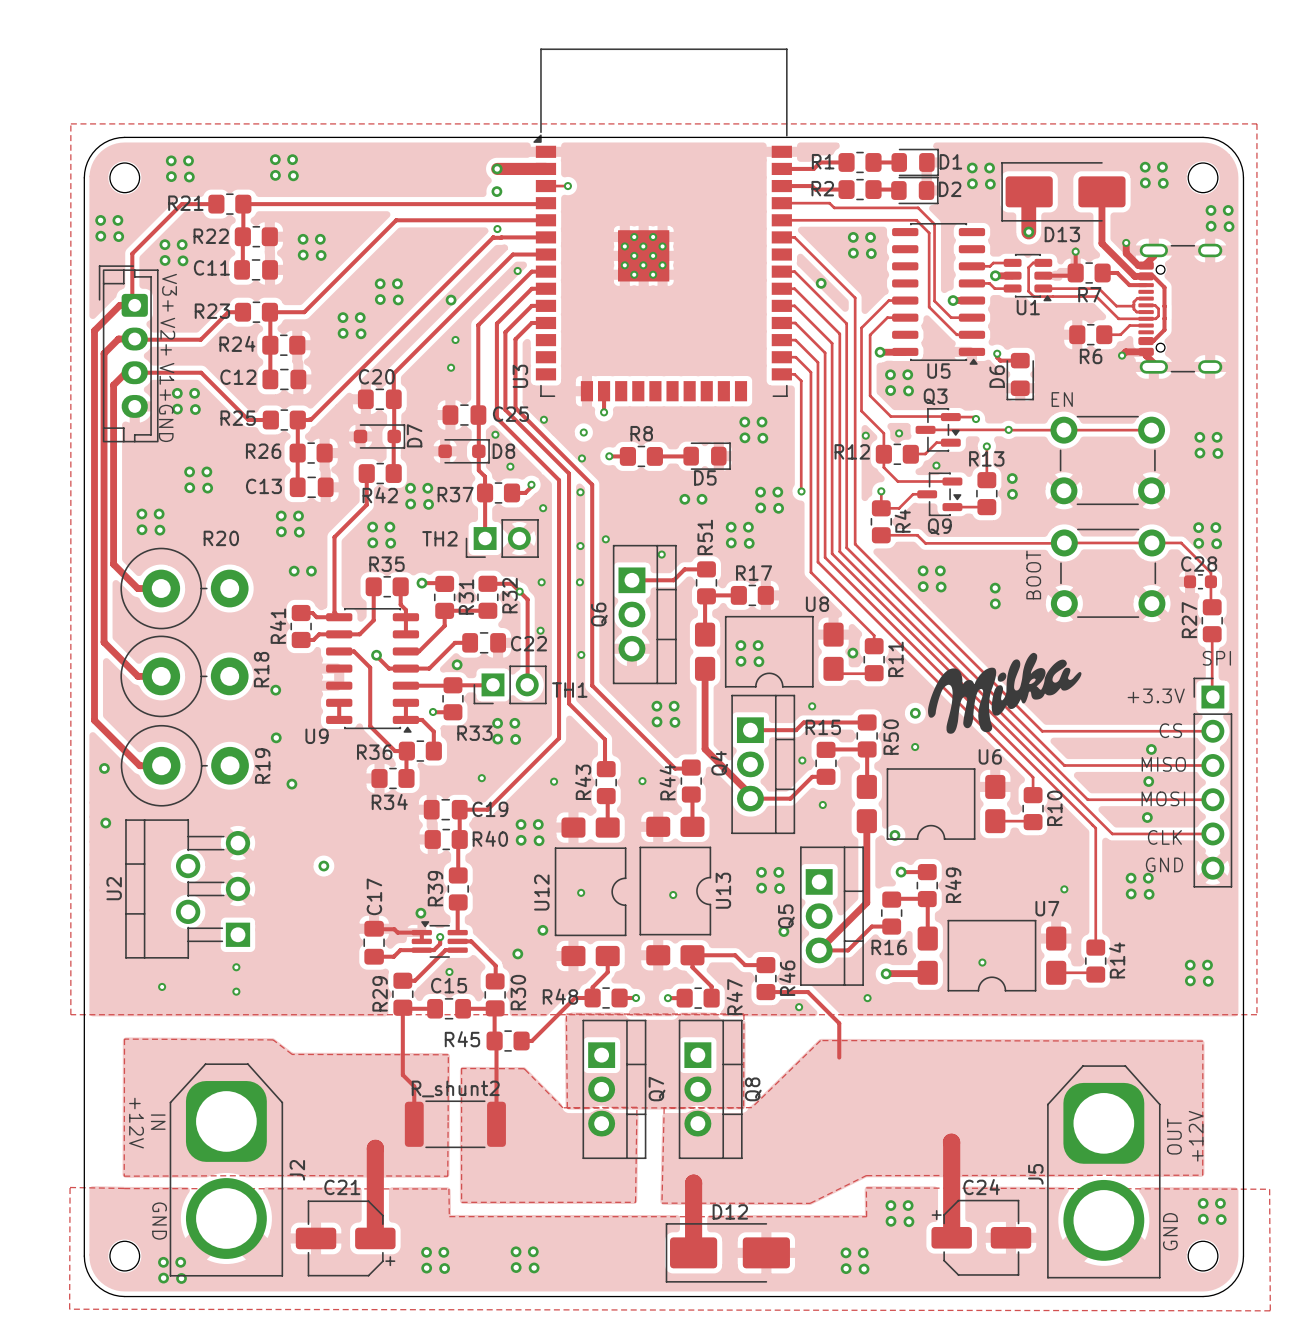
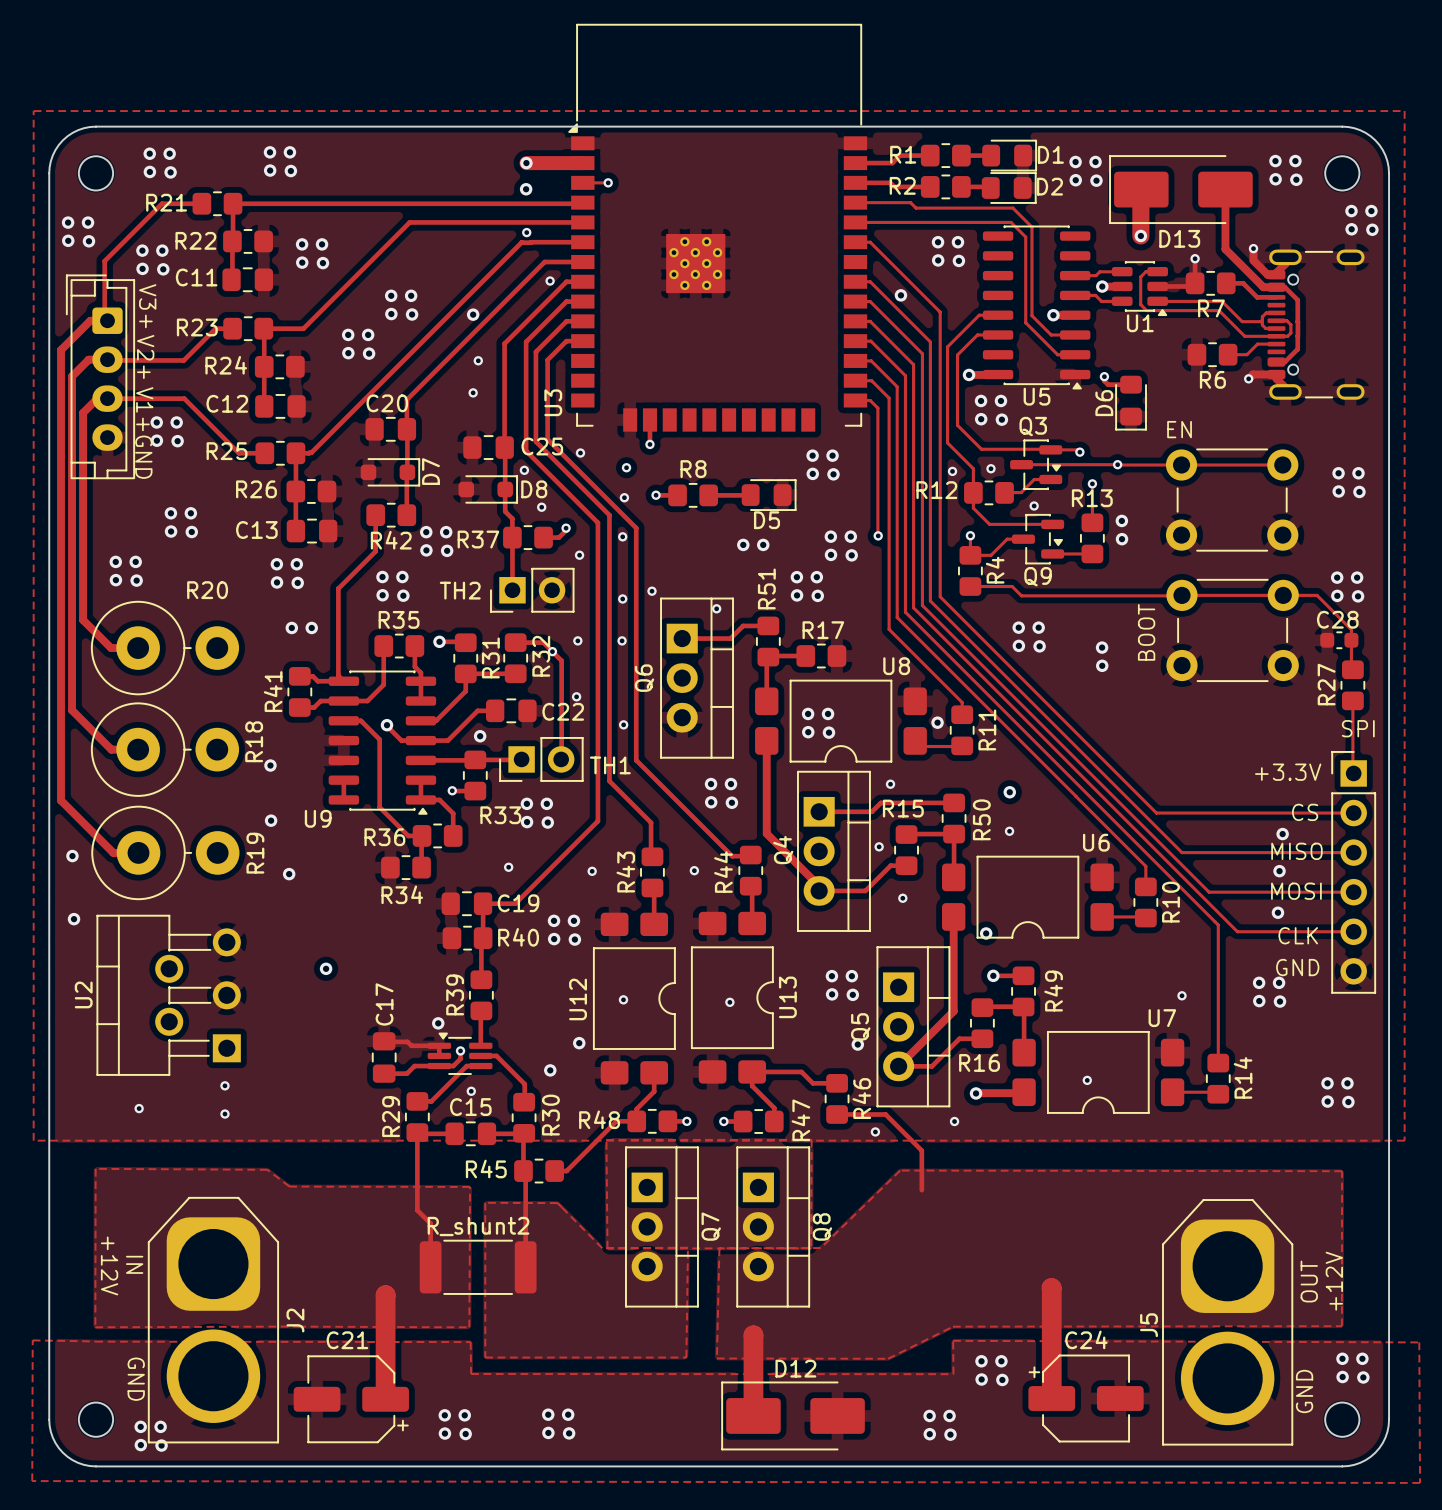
drawing: [928, 652, 1082, 734] -> none

